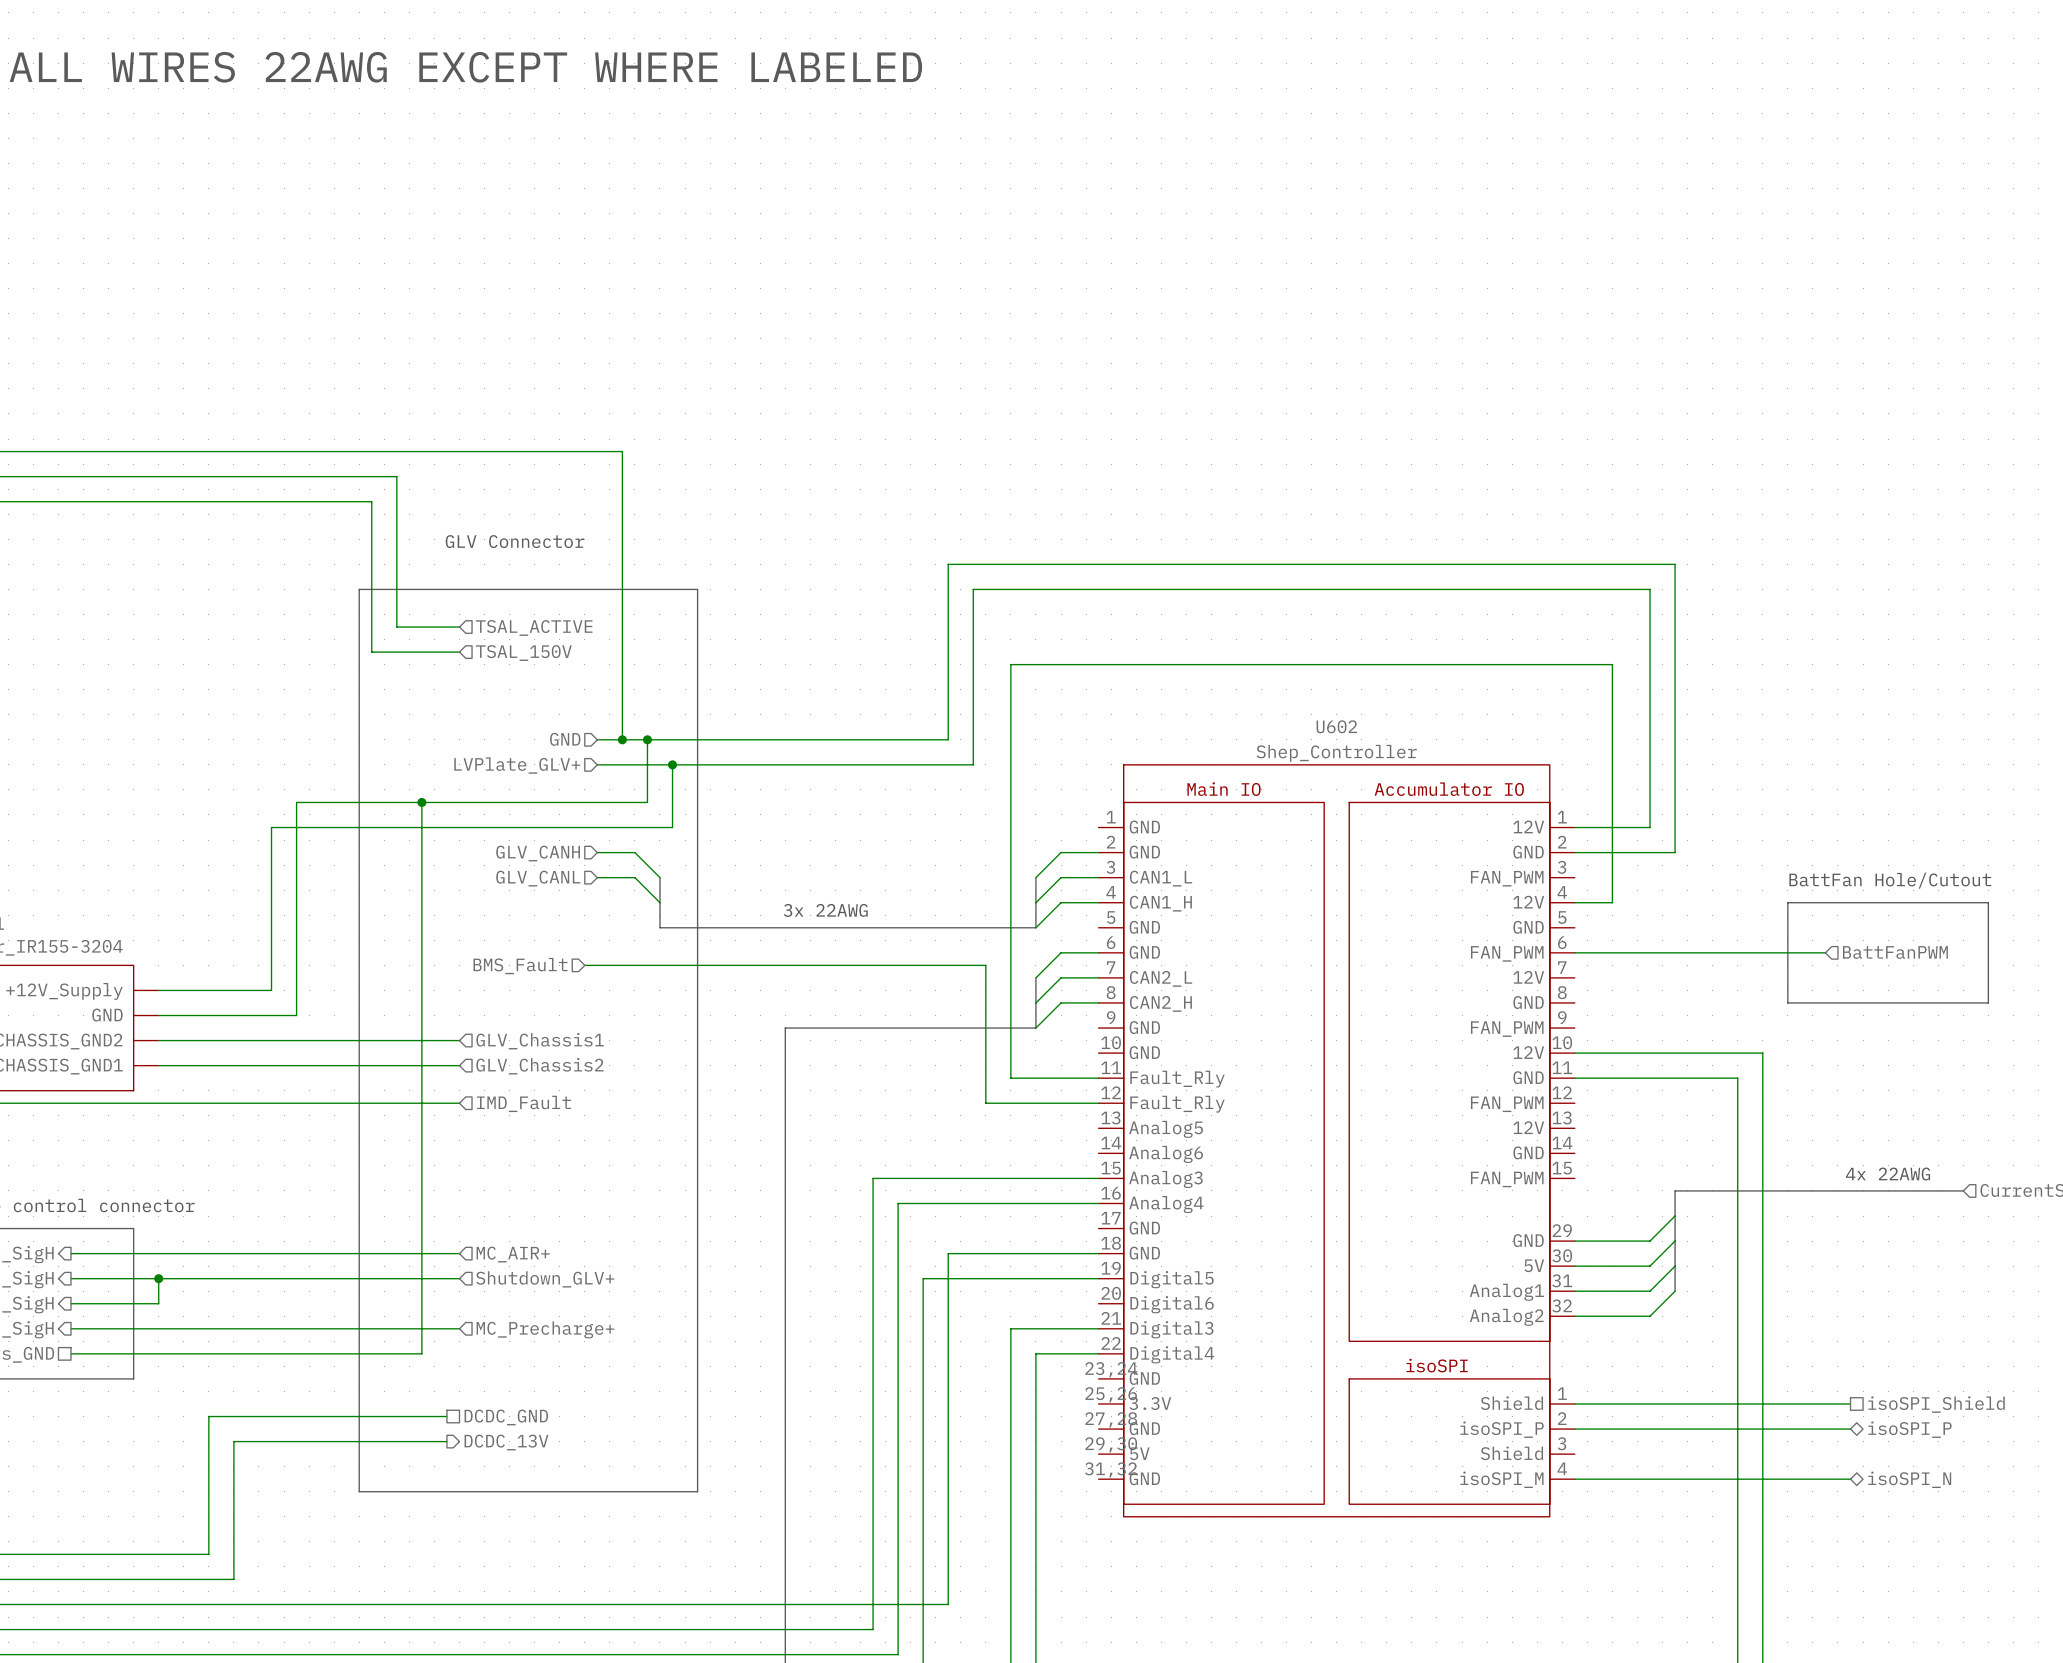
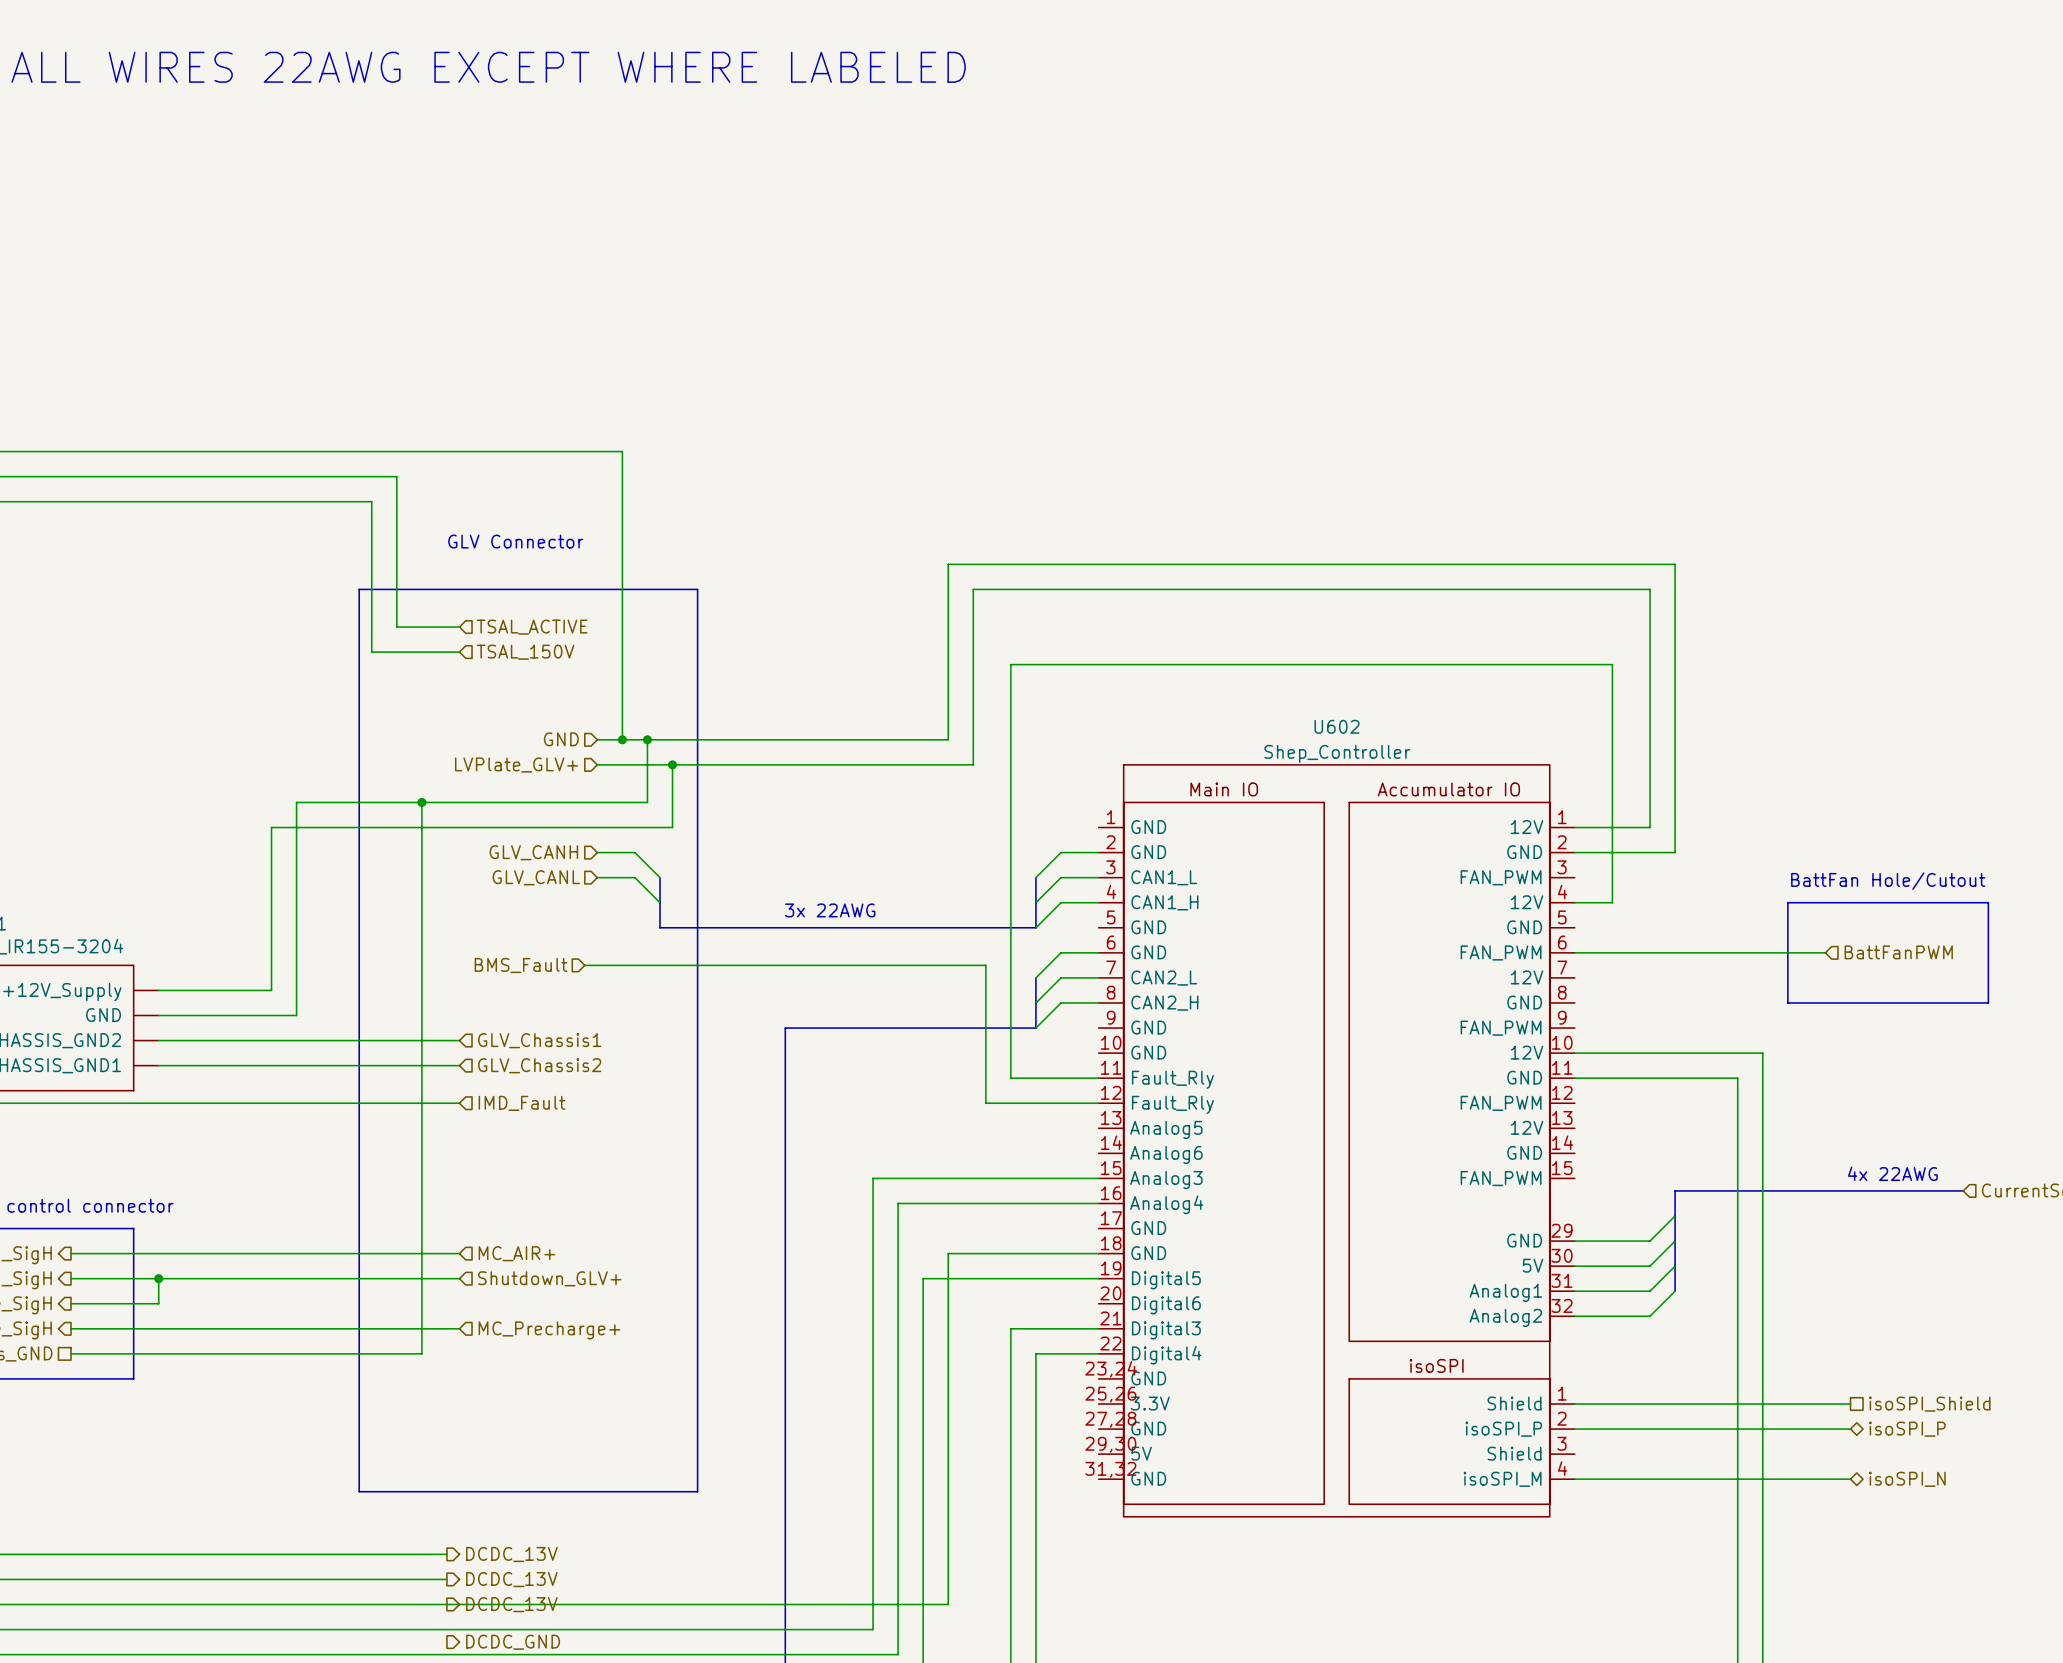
wire: (446, 1416) (208, 1416) (208, 1554) -> (446, 1554) (208, 1554)
hierarchical label: DCDC_GND (506, 1417) -> none
wire: (446, 1441) (233, 1441) (233, 1579) -> (446, 1579) (233, 1579)
hierarchical label: DCDC_13V (506, 1442) -> none
hierarchical label: none -> DCDC_13V (511, 1554)
hierarchical label: none -> DCDC_13V (511, 1579)
hierarchical label: none -> DCDC_13V (511, 1604)
hierarchical label: none -> DCDC_GND (513, 1642)

